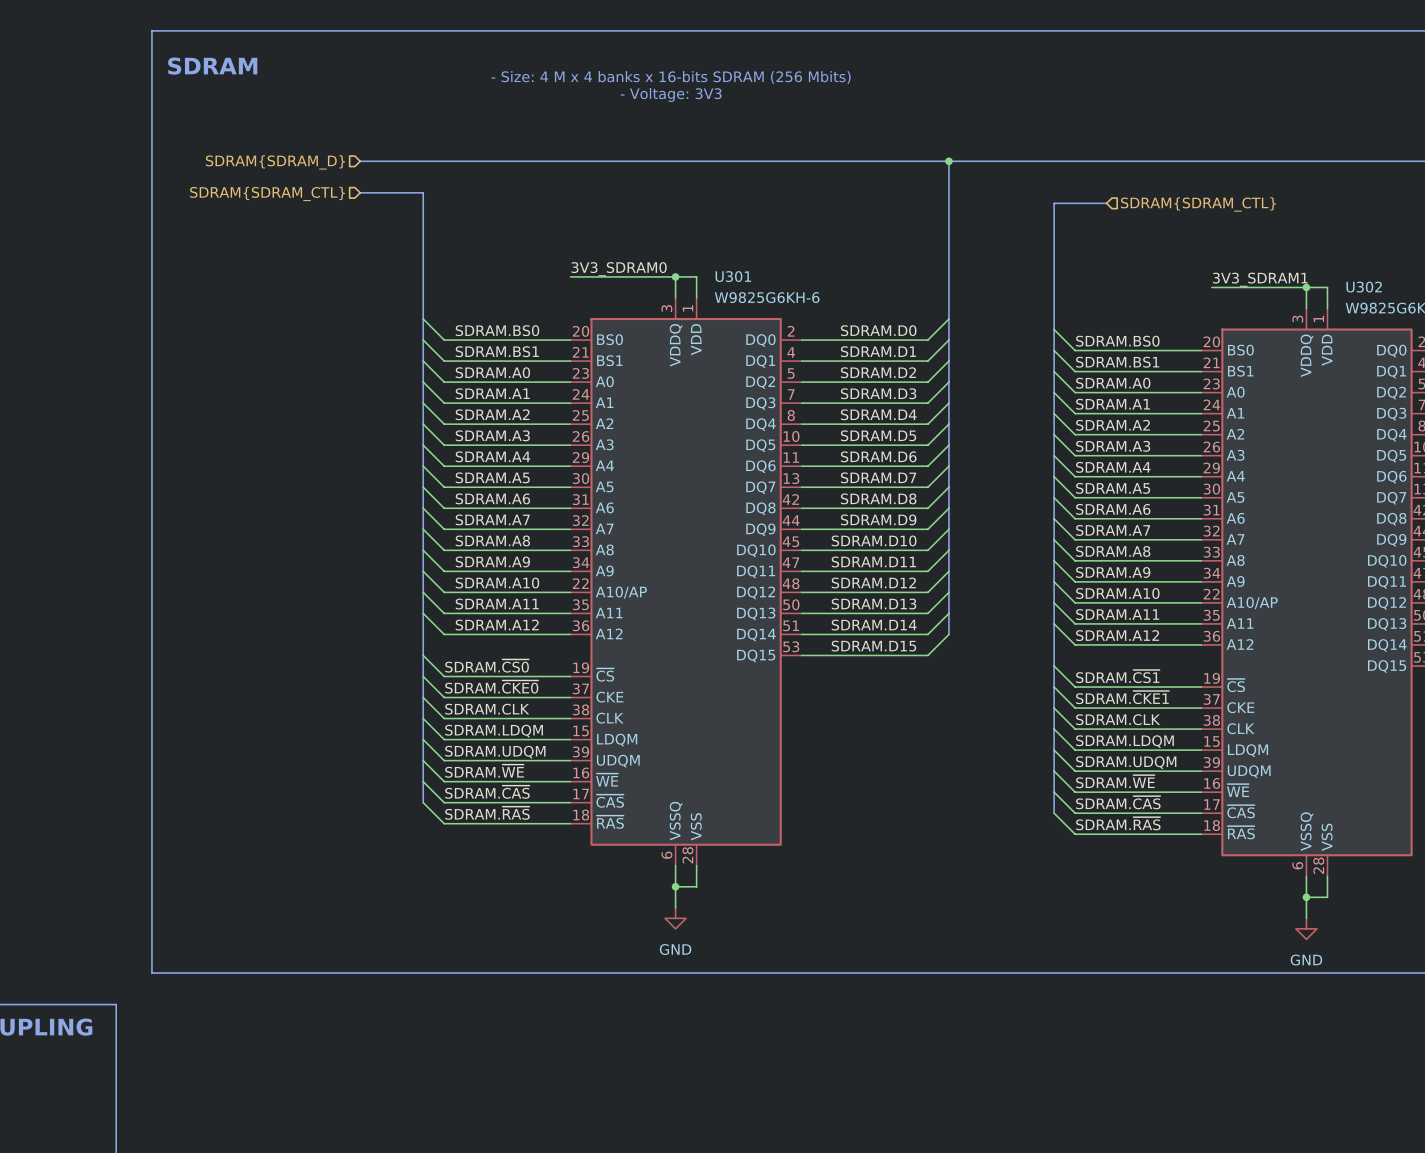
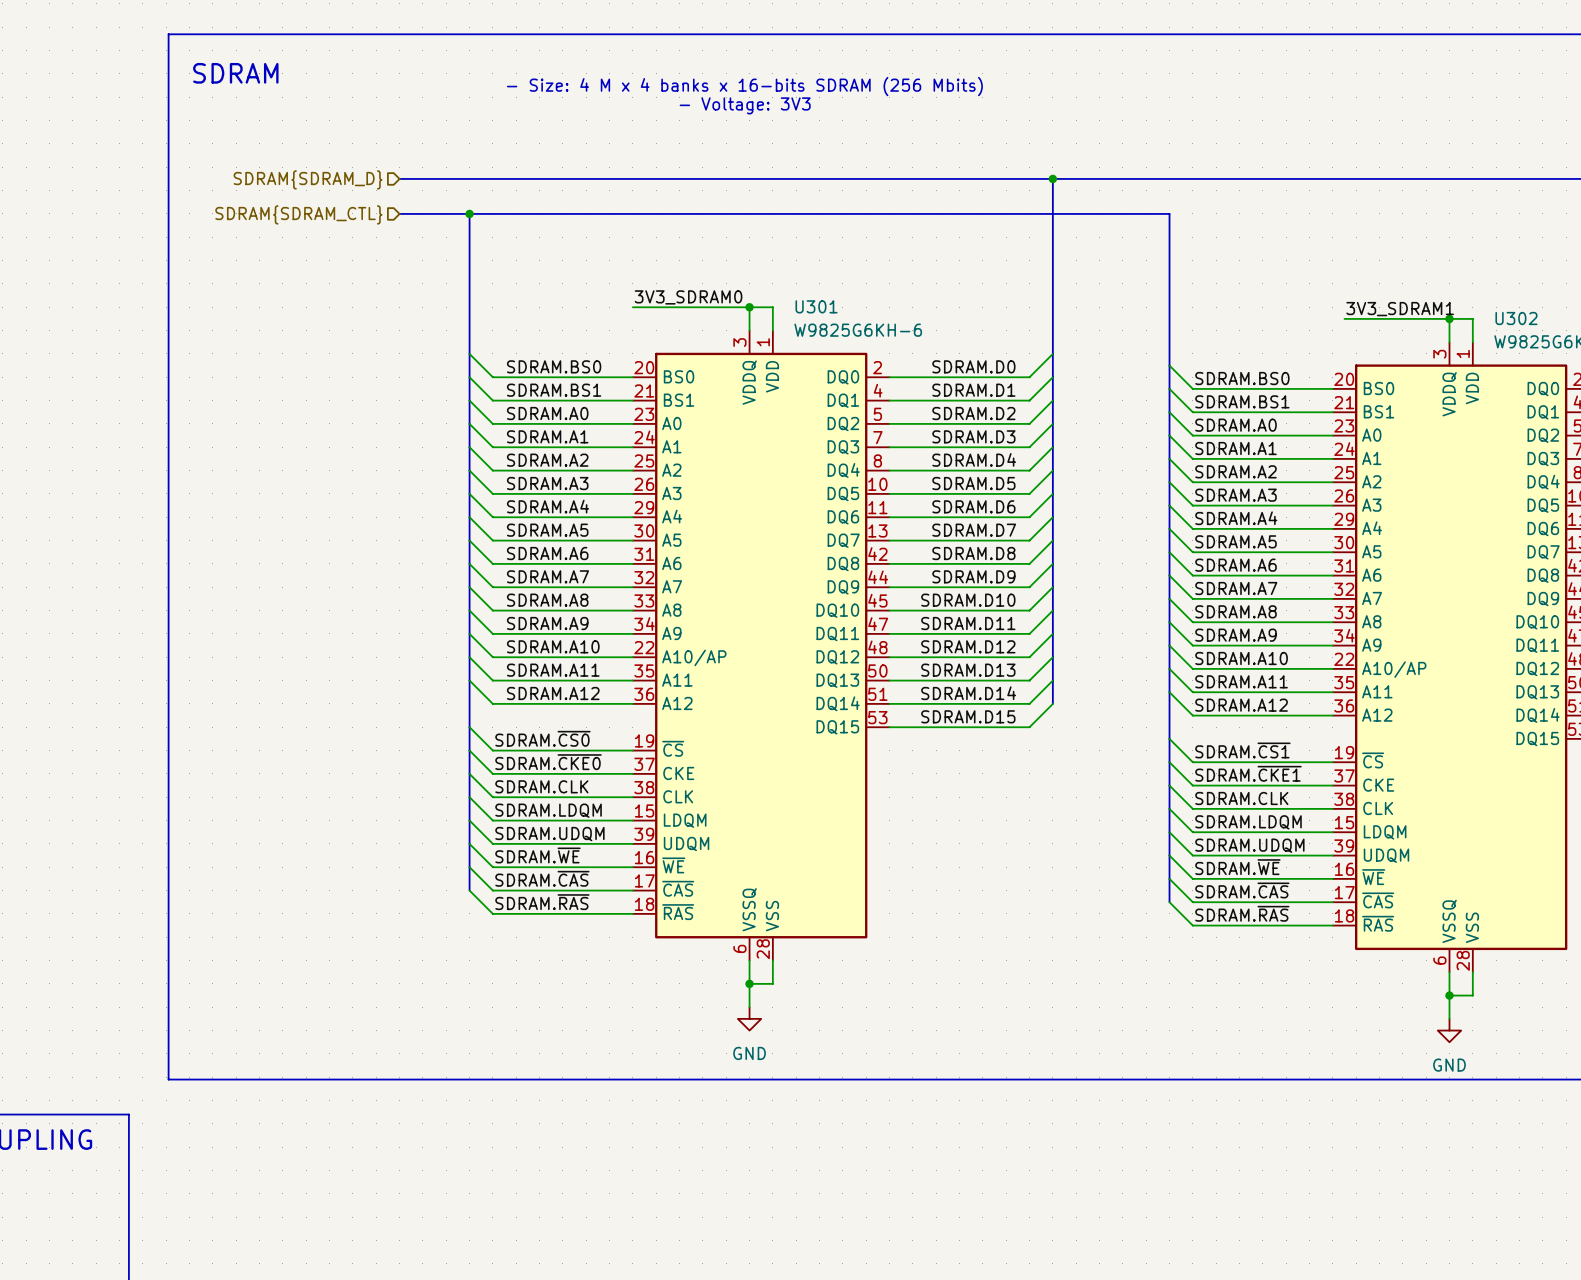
junction: none -> (469, 213)
bus: (1054, 203) (1106, 203) -> (1169, 225) (1169, 213) (469, 213)
hierarchical label: SDRAM{SDRAM_CTL} (1198, 204) -> none

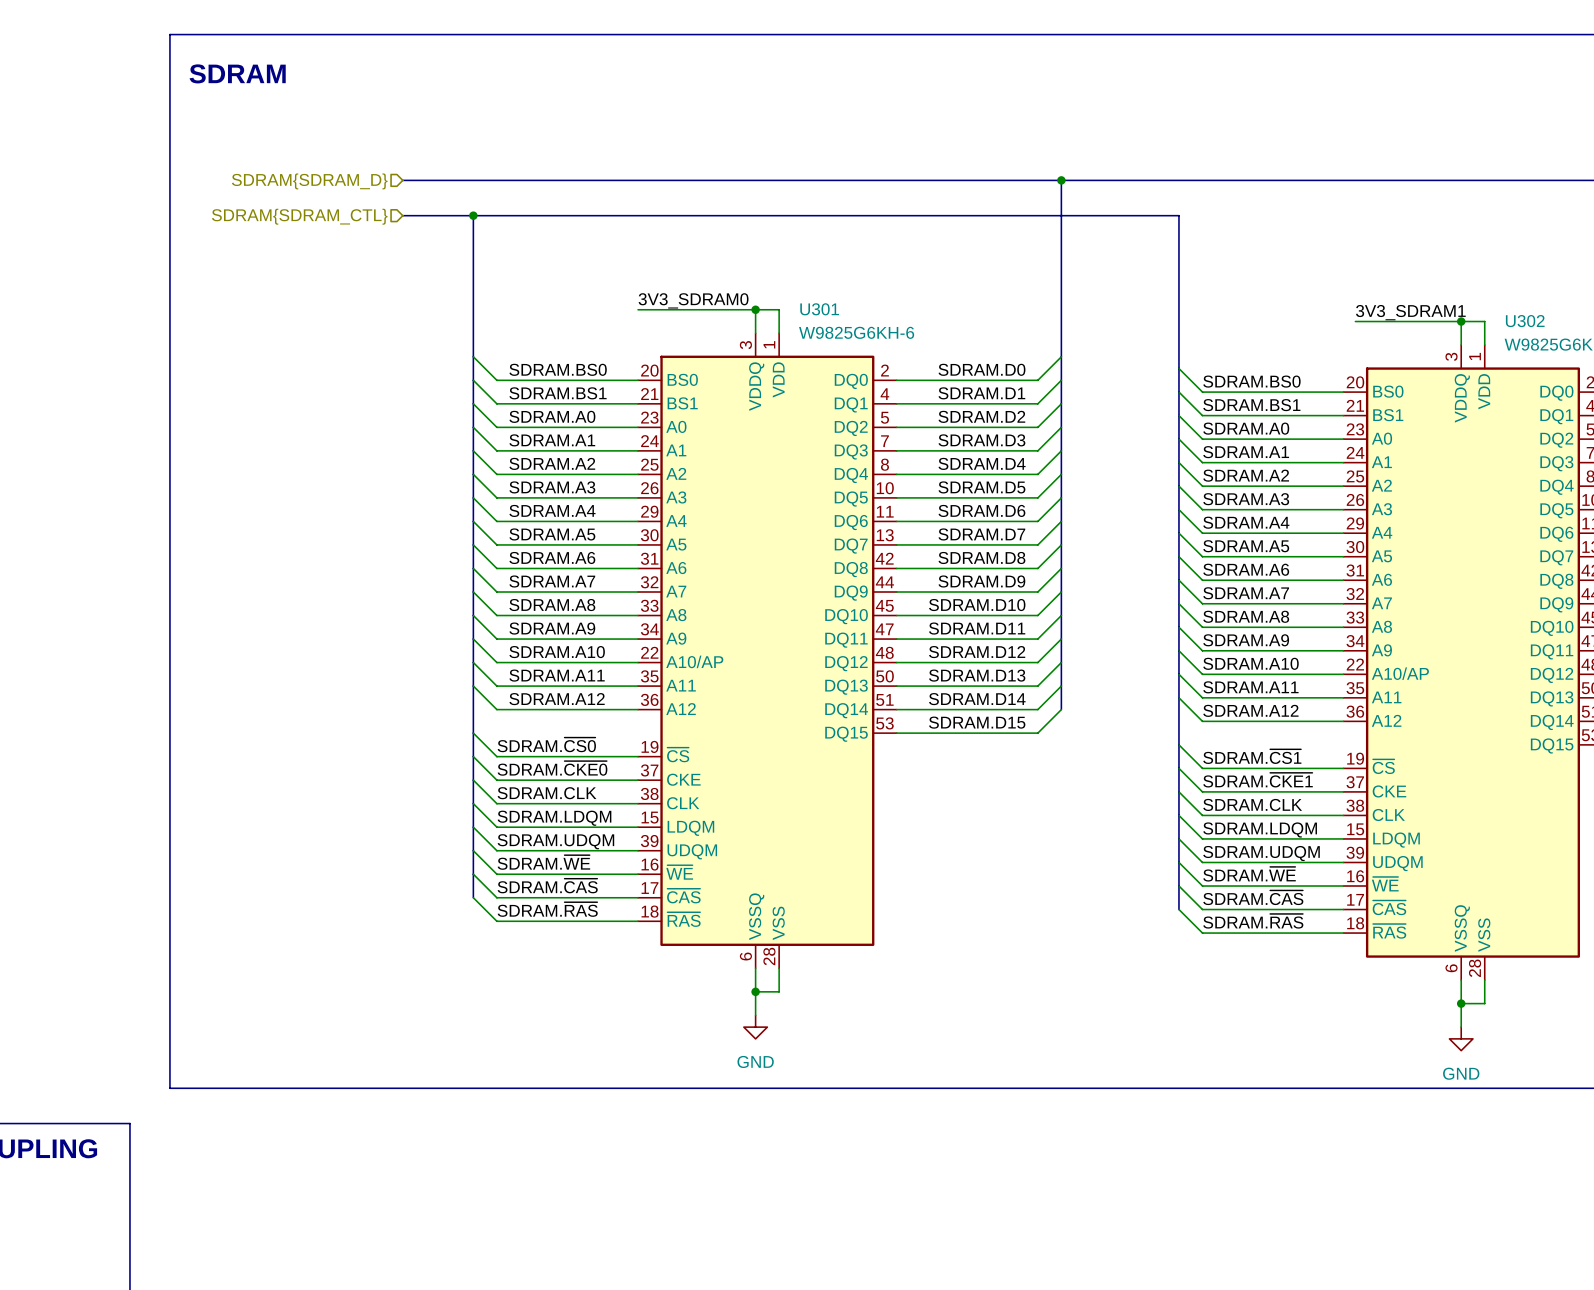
text: - Size: 4 M x 4 banks x 16-bits SDRAM (256 Mbits) (744, 86) -> none
text: - Voltage: 3V3 (745, 105) -> none

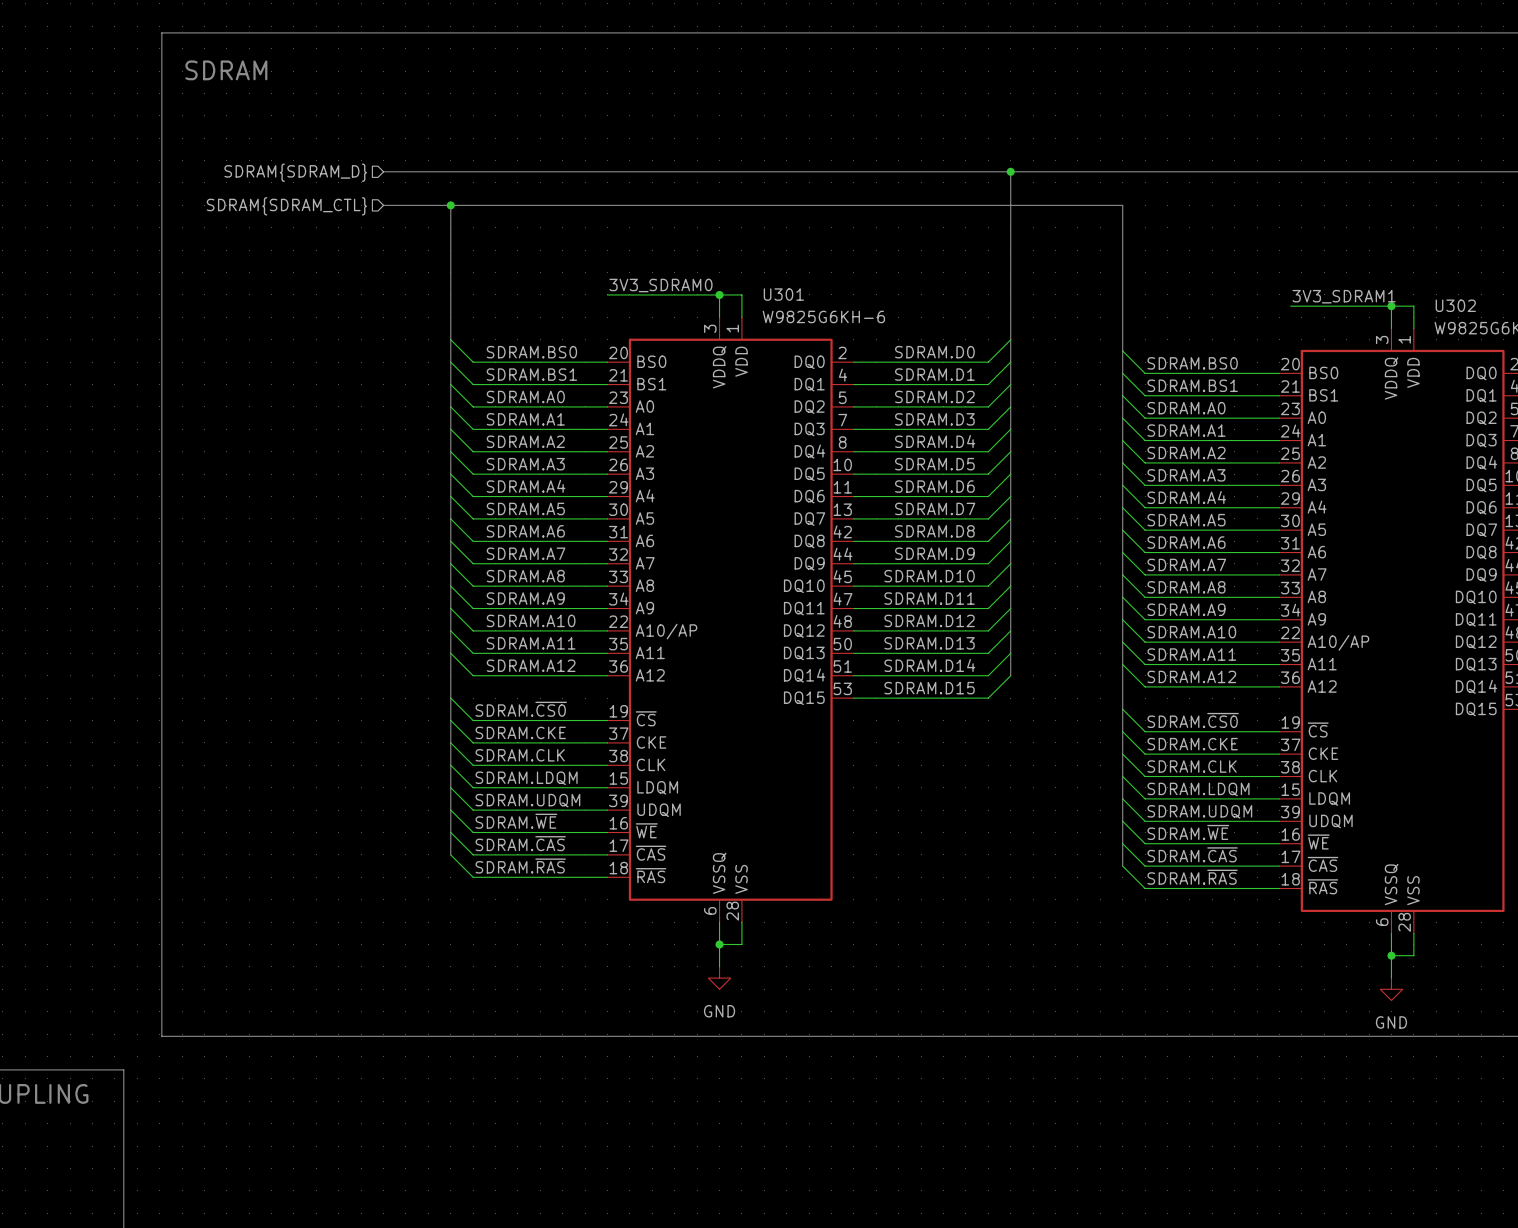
label: SDRAM.~{CS1} (1252, 756) -> SDRAM.~{CS0} (1193, 720)
label: SDRAM.~{CKE0} (552, 768) -> SDRAM.CKE (520, 732)
label: SDRAM.~{CKE1} (1258, 780) -> SDRAM.CKE (1192, 744)

